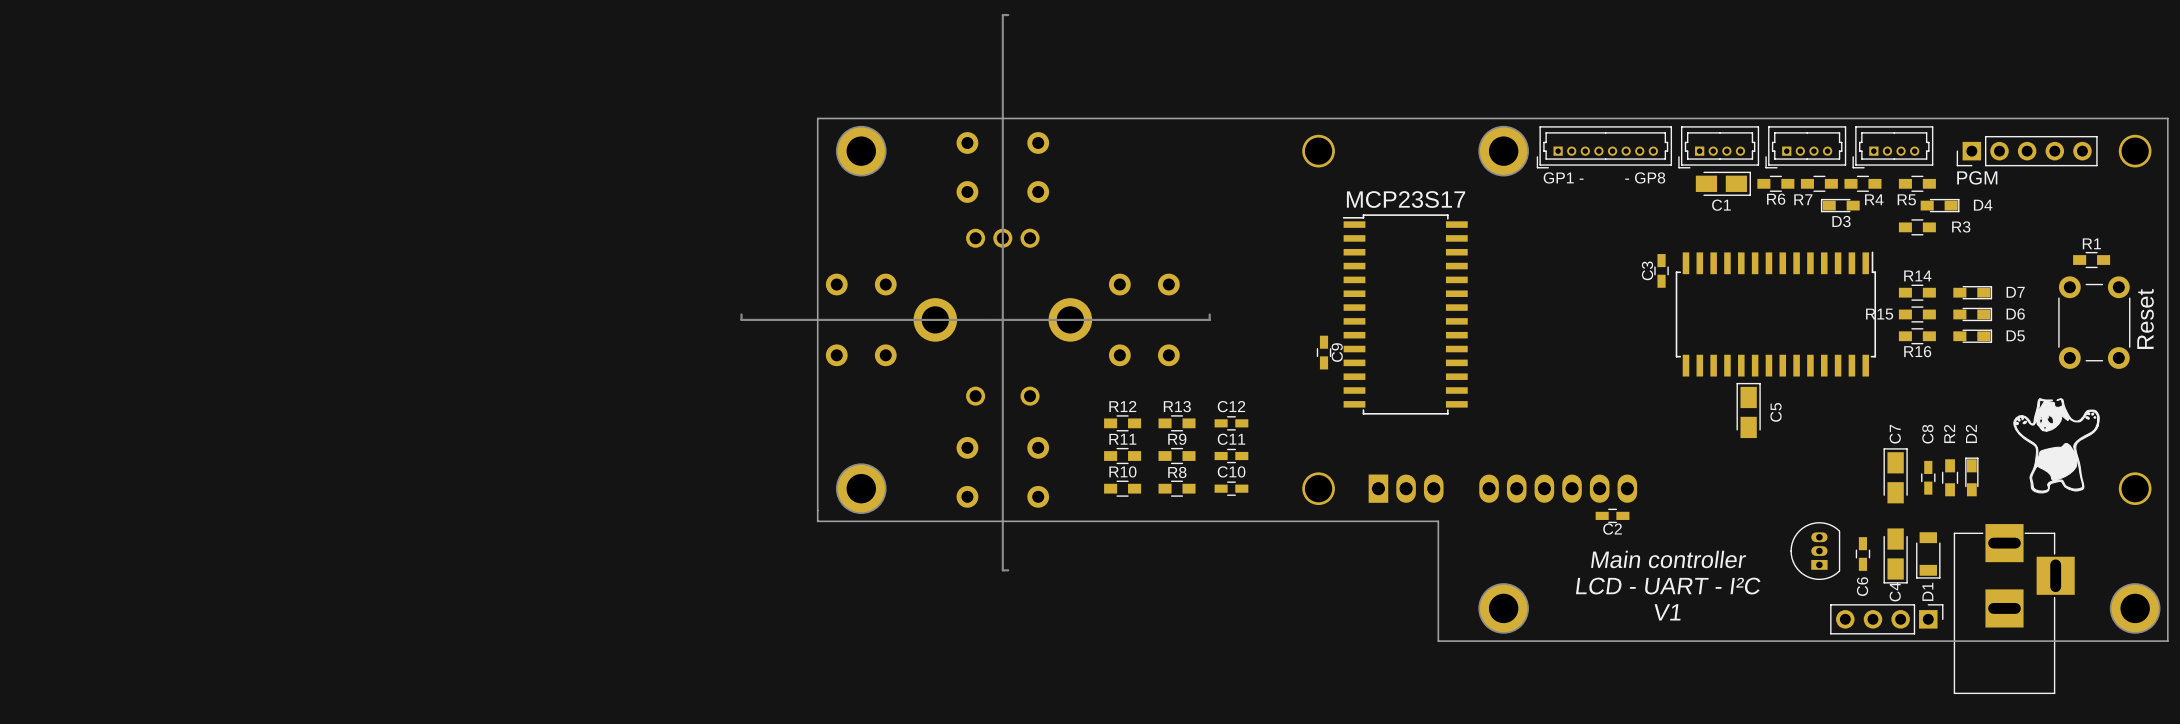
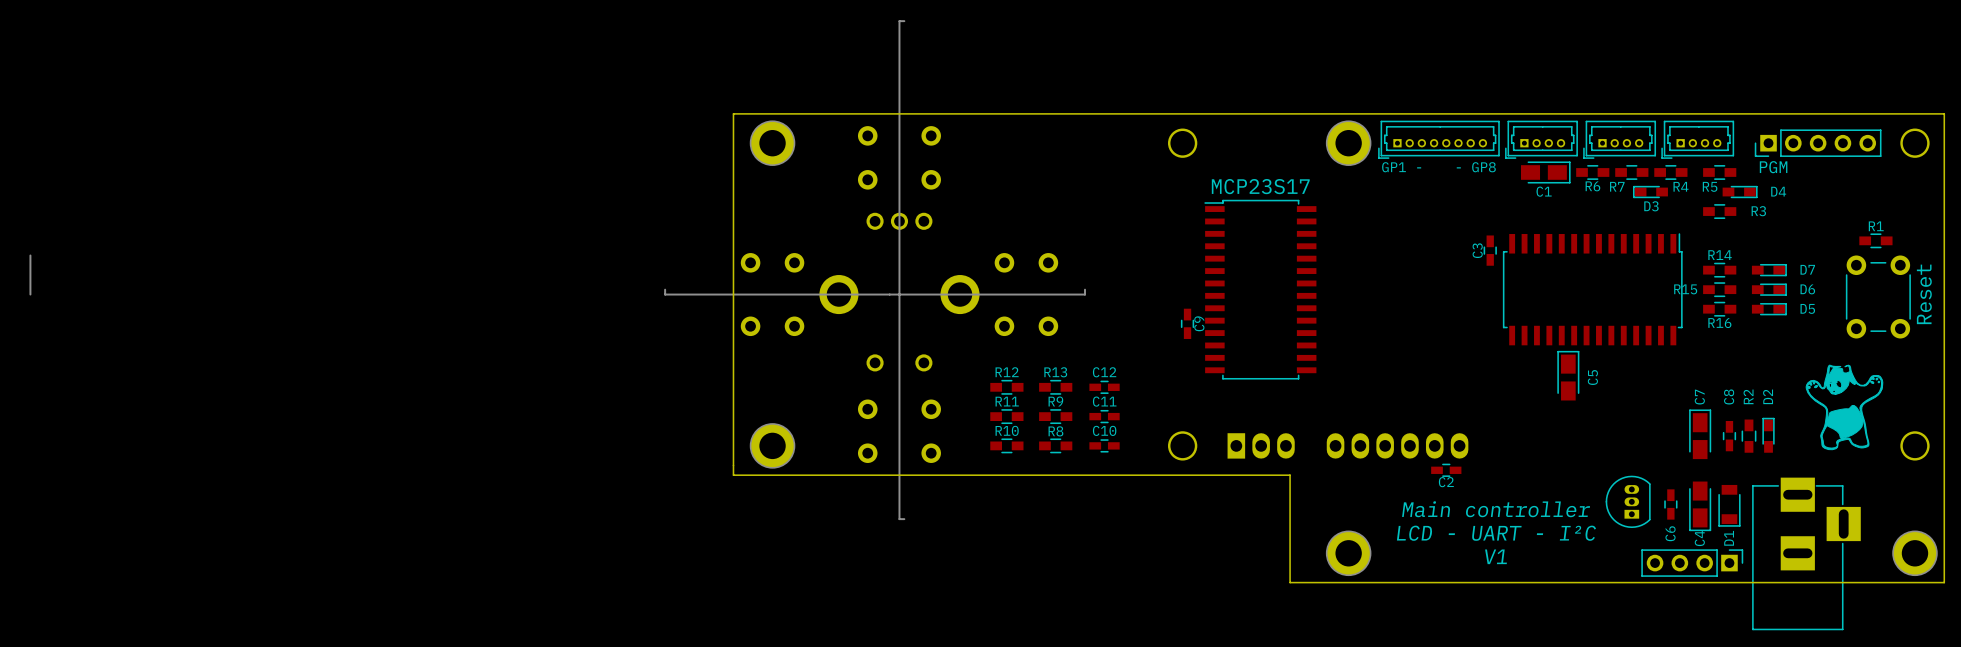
line: none -> (30, 255) (30, 294)

